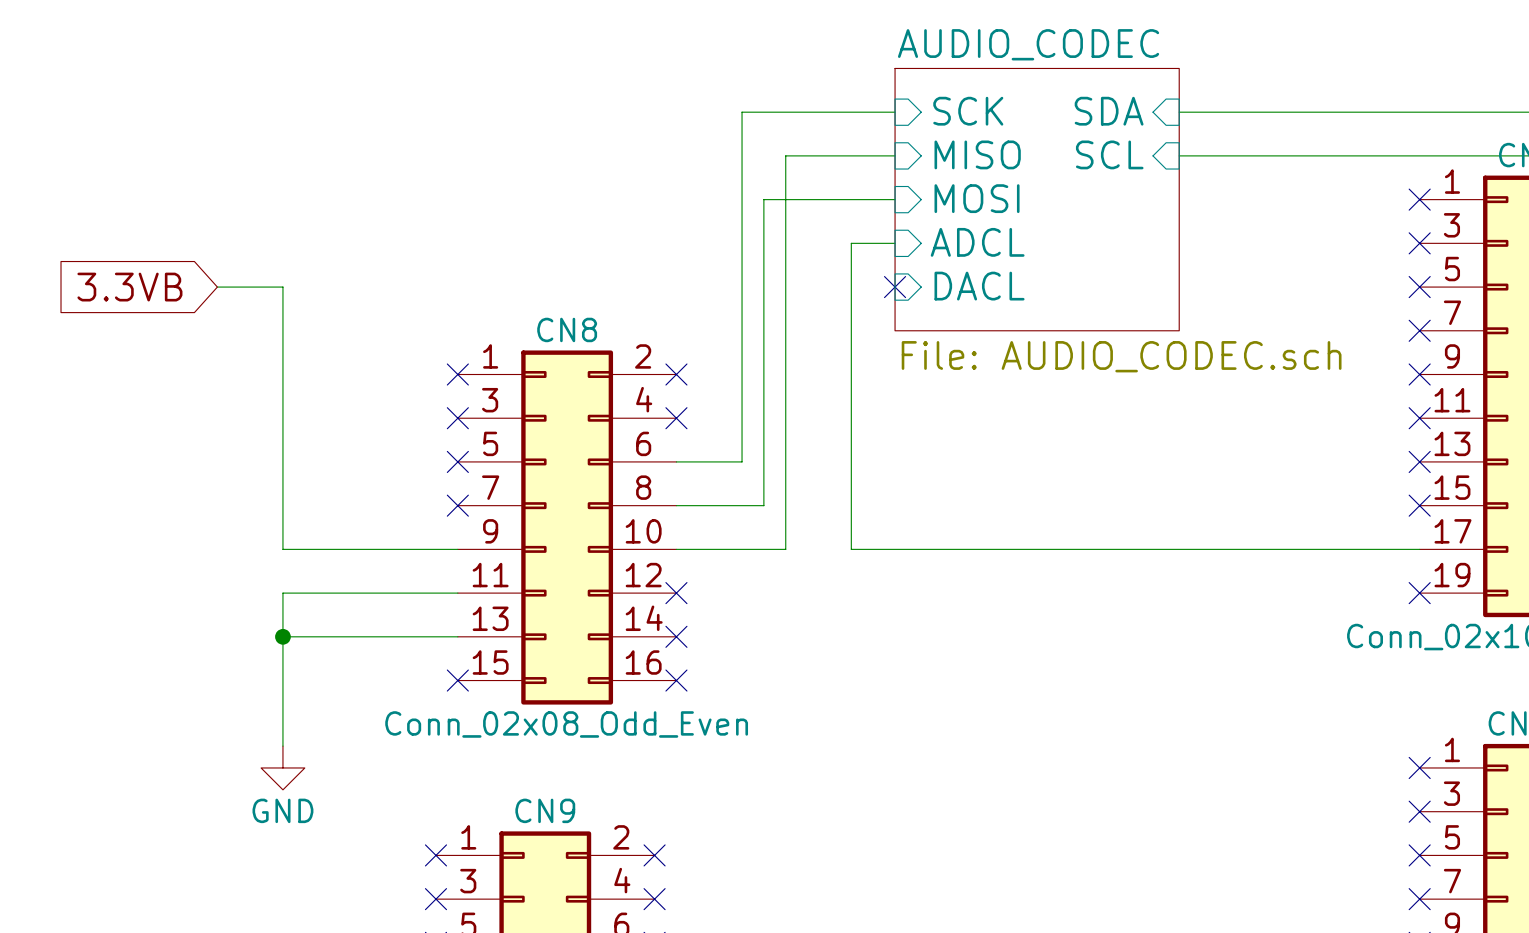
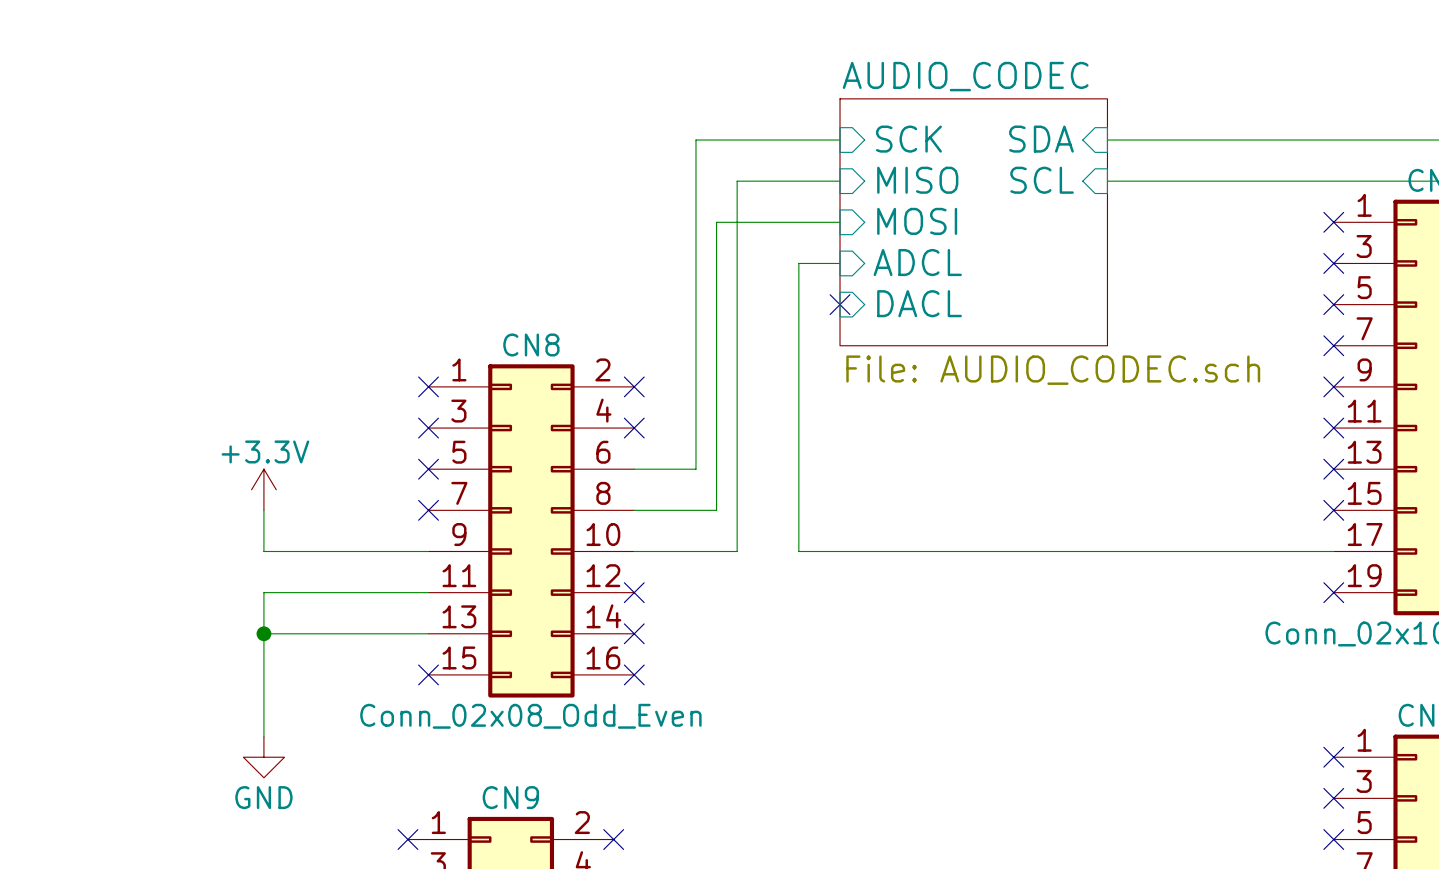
global label: 3.3VB (129, 287) -> none
wire: (217, 287) (282, 287) (282, 505) -> none
power symbol: none -> +3.3V (263, 489)

